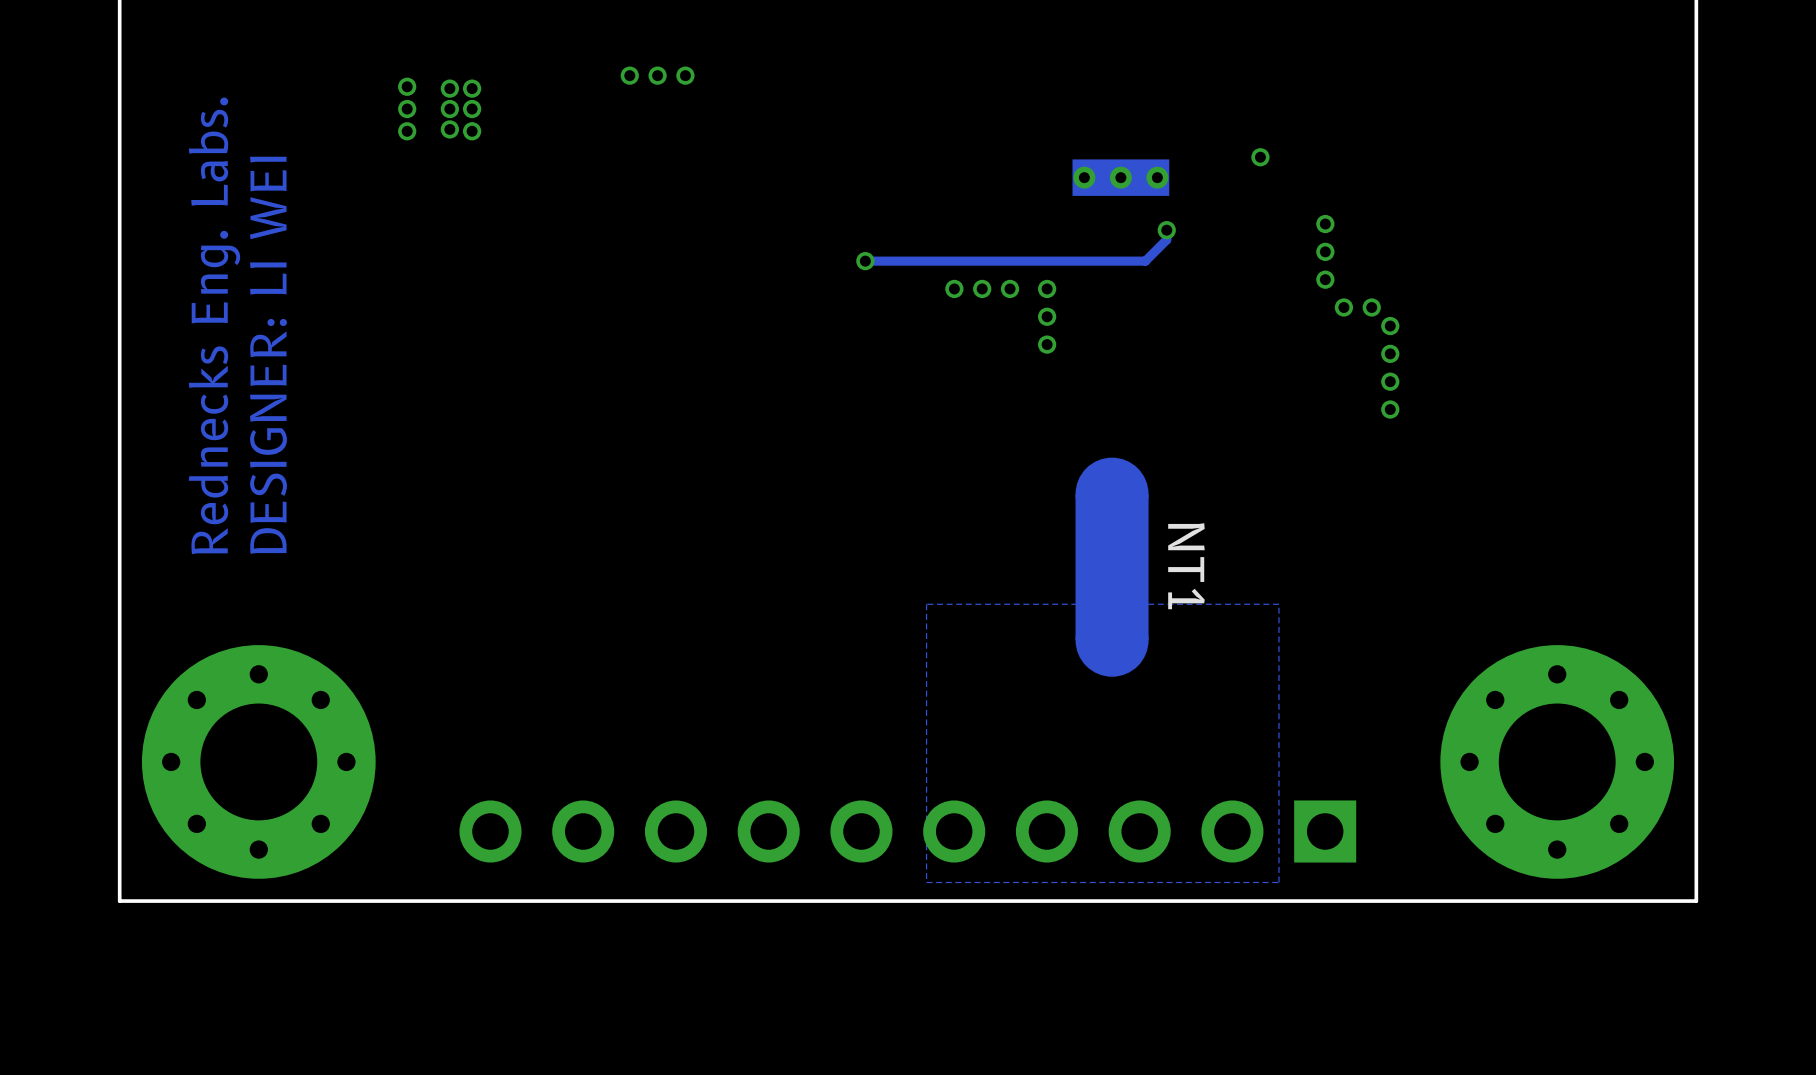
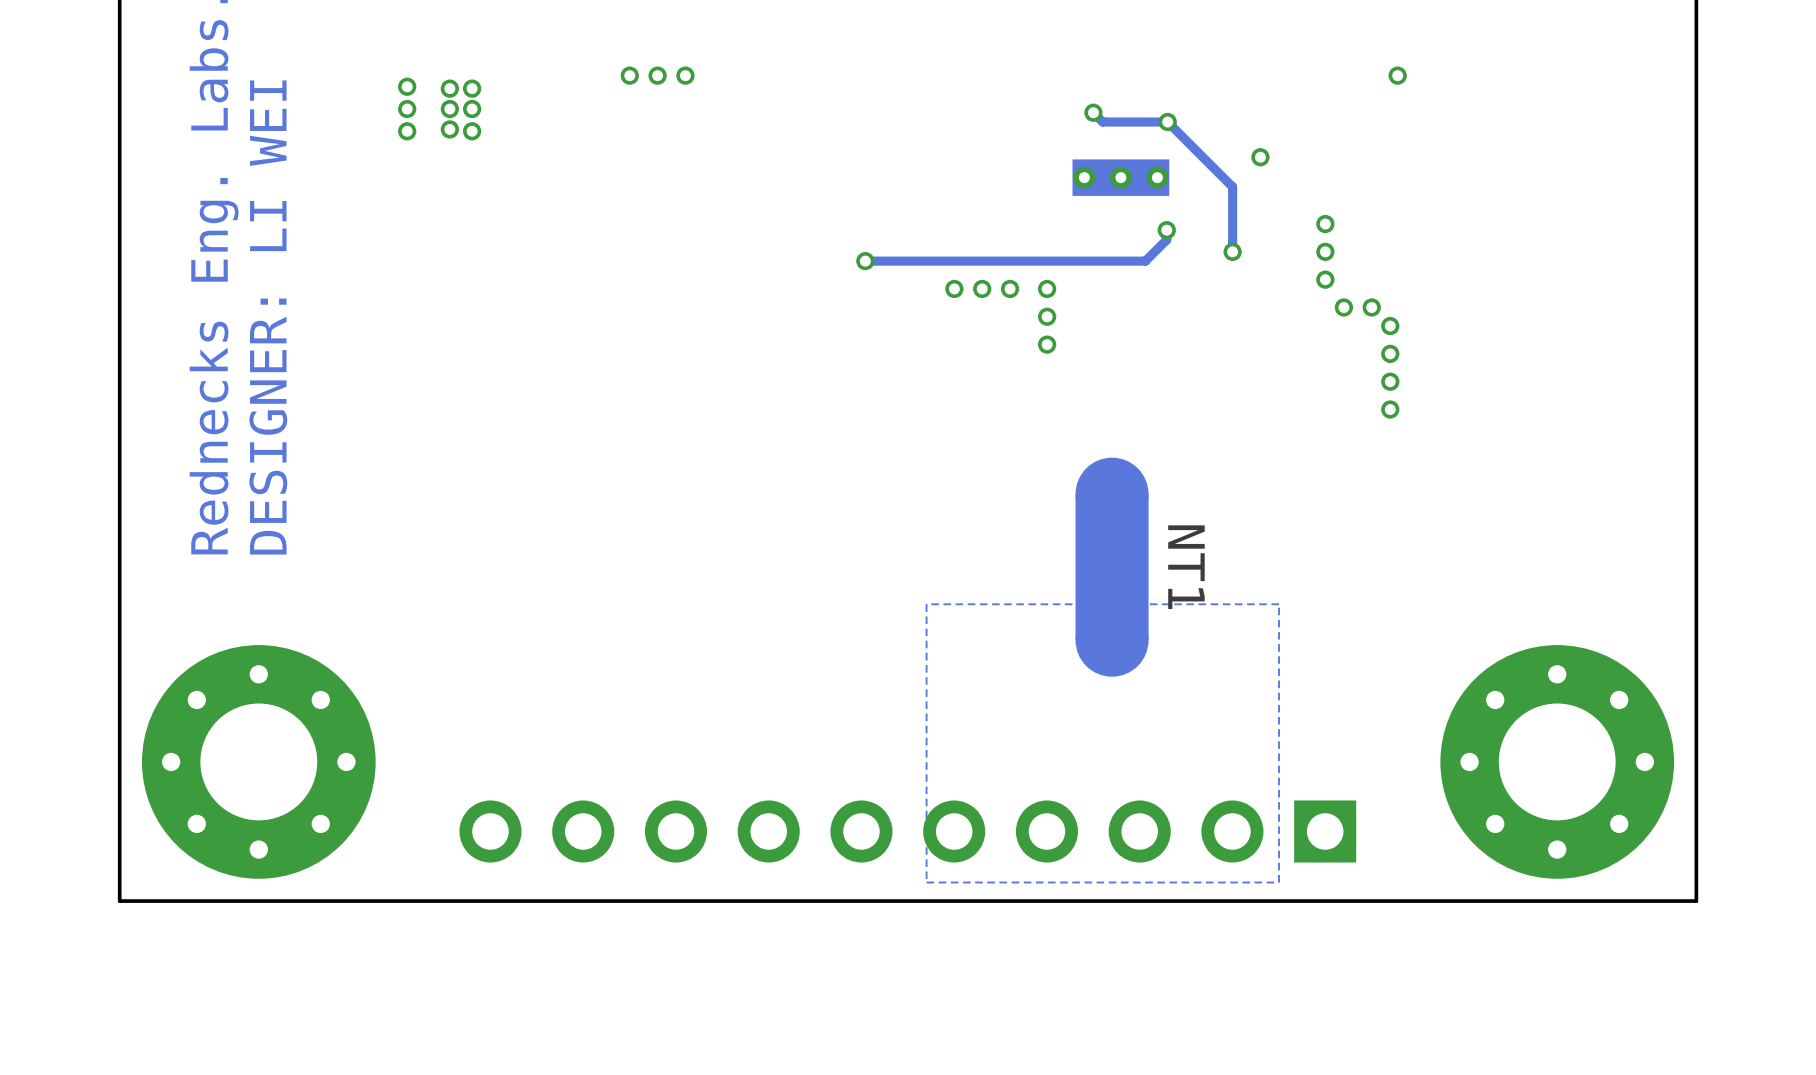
via: none -> (1397, 75)
track: none -> (1093, 112) (1102, 122) (1167, 122) (1232, 186) (1232, 251)
via: none -> (1093, 112)
via: none -> (1167, 122)
via: none -> (1232, 251)

